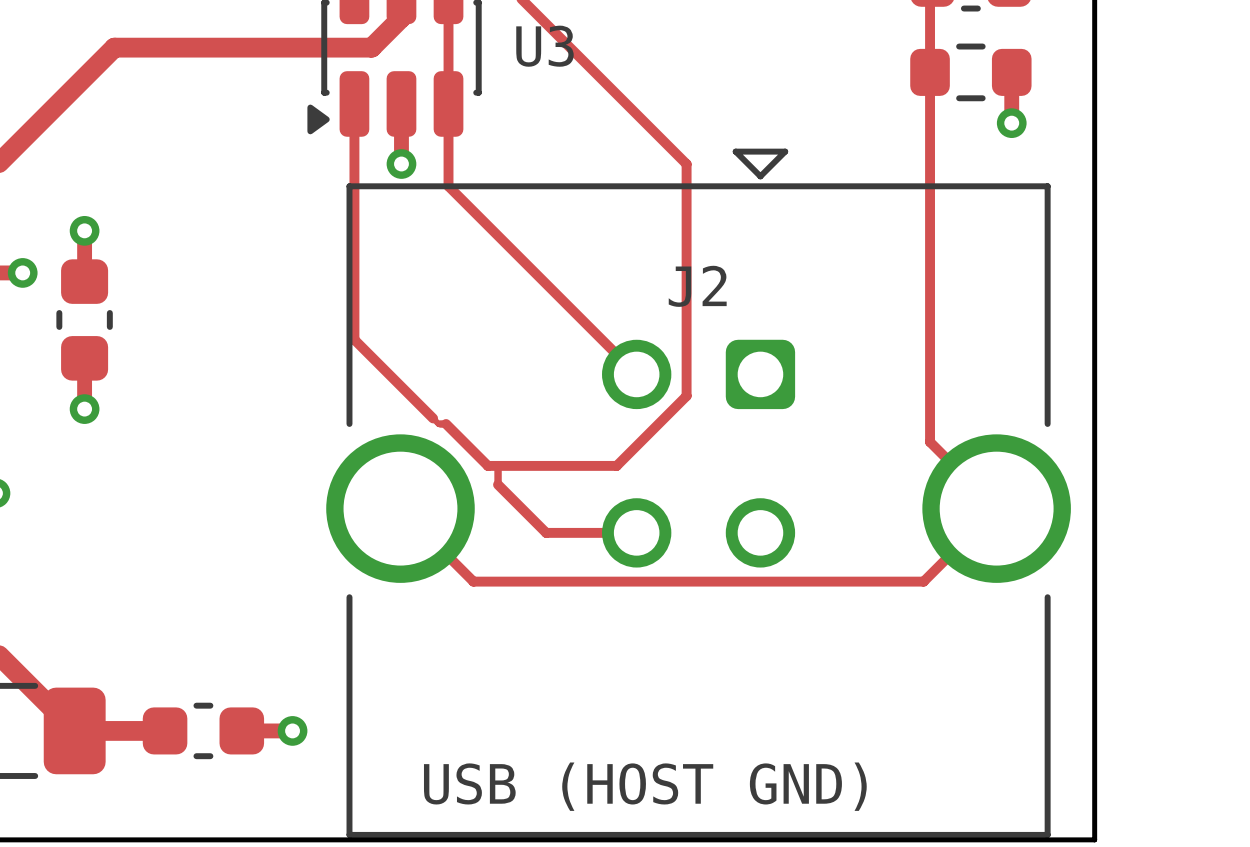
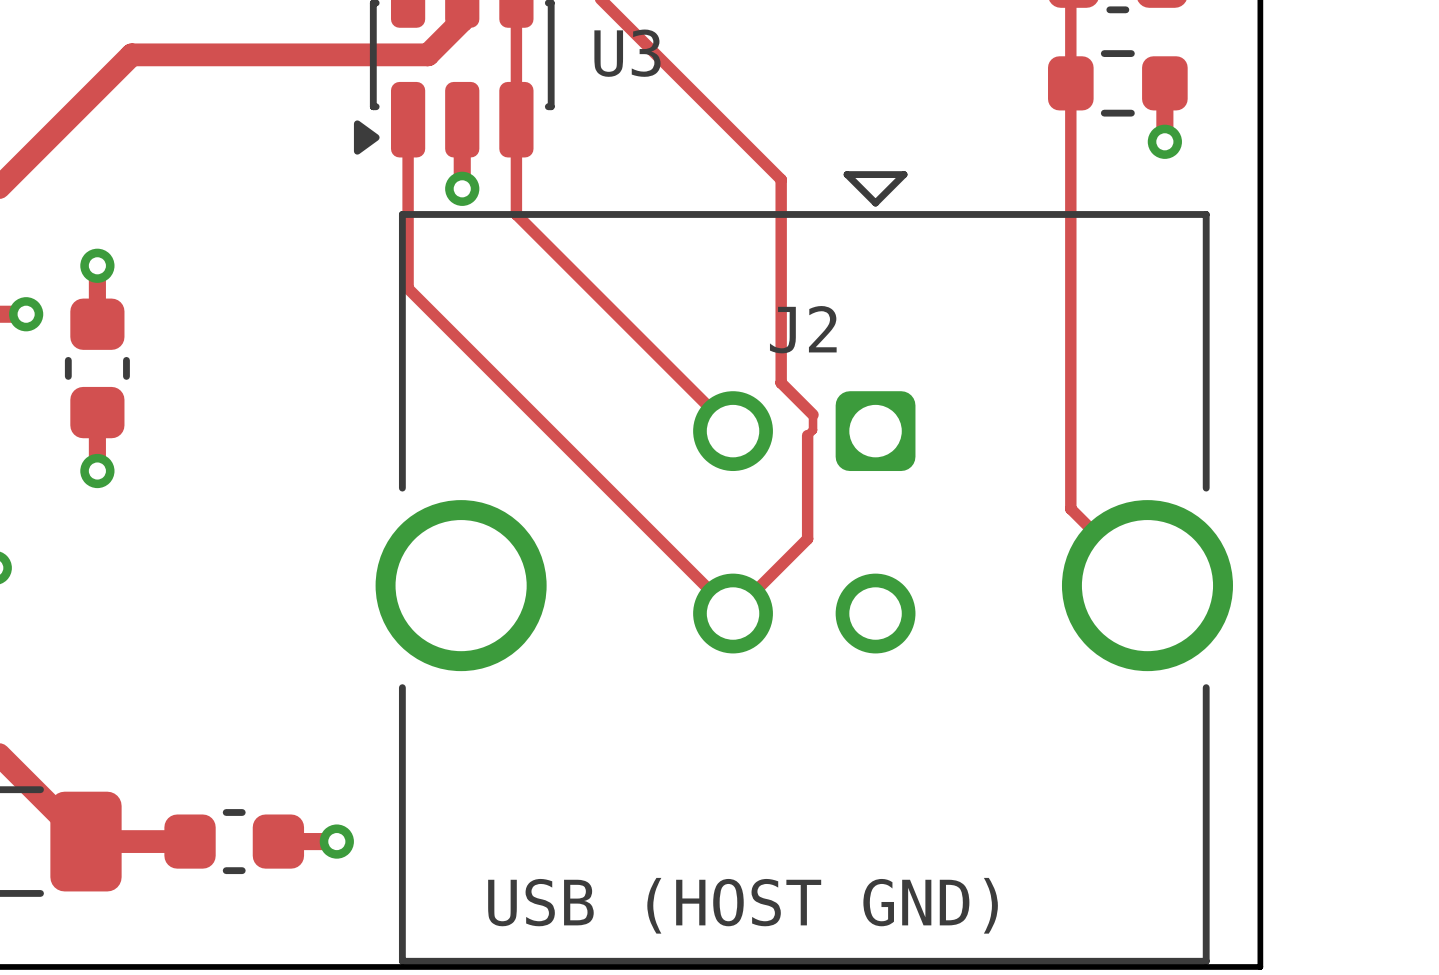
track: (678, 156) (686, 164) (686, 396) (616, 465) (487, 465) (446, 424) (438, 424) (354, 339) (354, 250) -> (781, 179) (781, 382) (813, 414) (813, 430) (807, 435) (807, 538) (733, 613) (408, 288)
track: (498, 465) (498, 484) (546, 532) (636, 532) -> none
track: (400, 508) (473, 581) (923, 581) (996, 508) -> none

